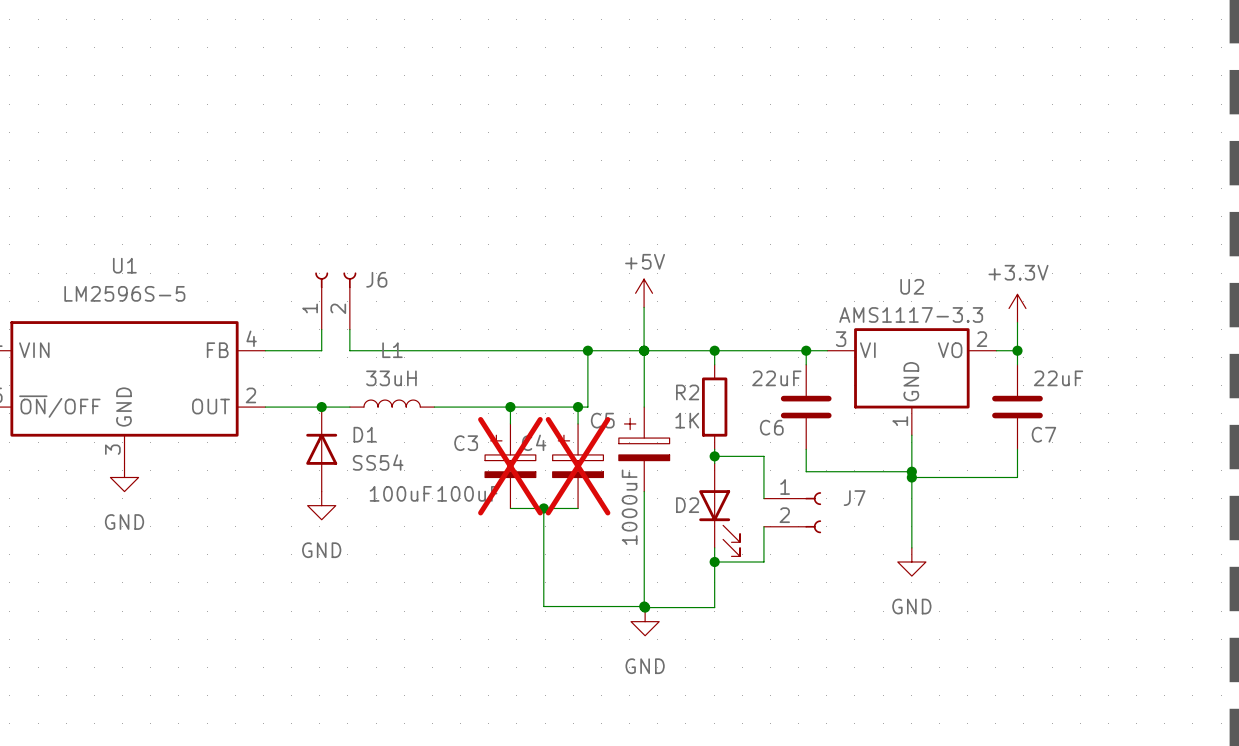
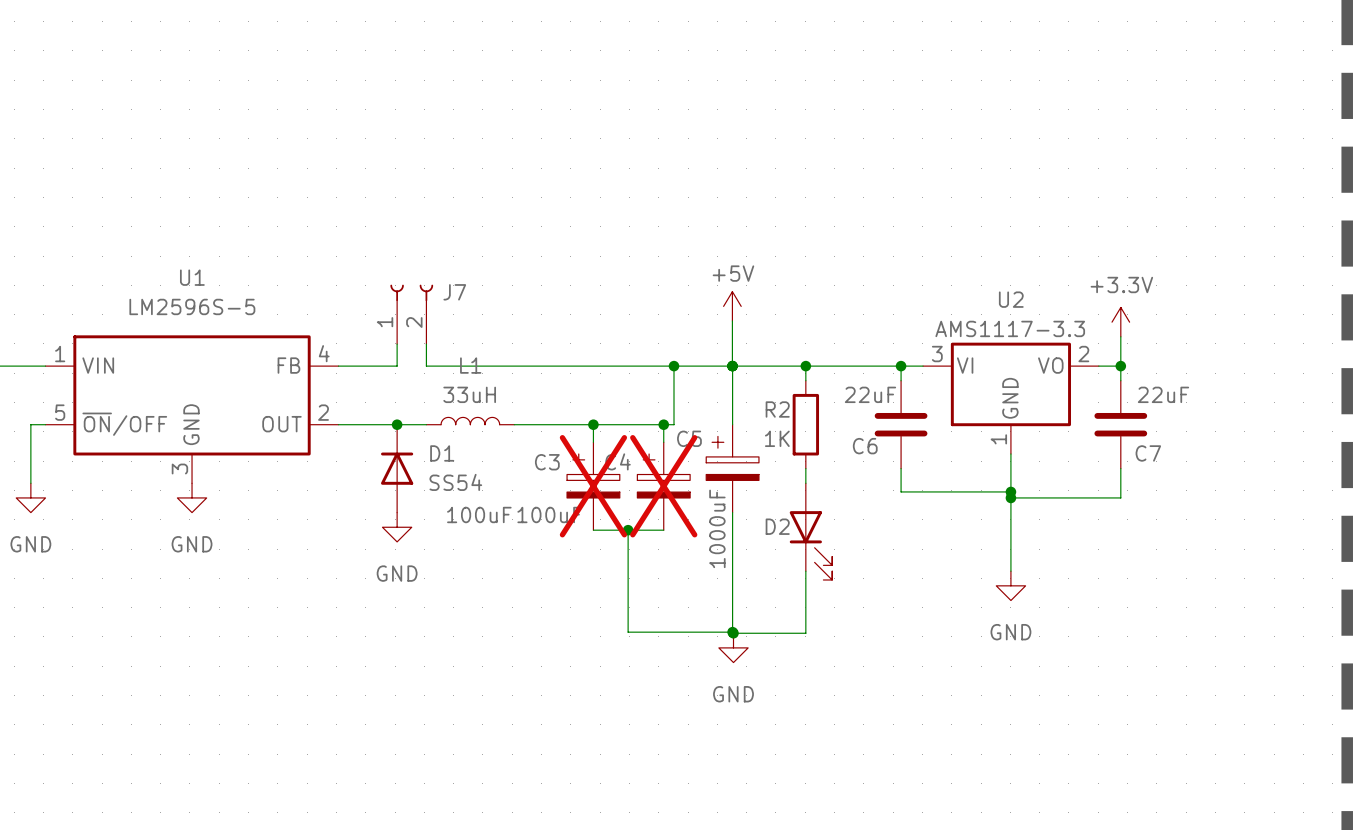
J6 name: J6 (376, 279) -> J7 (454, 292)
wire: (714, 456) (763, 456) (763, 498) -> none
junction: (714, 456) -> none
J7: (792, 512) -> none
wire: (763, 526) (763, 562) (714, 562) -> none
junction: (714, 562) -> none

